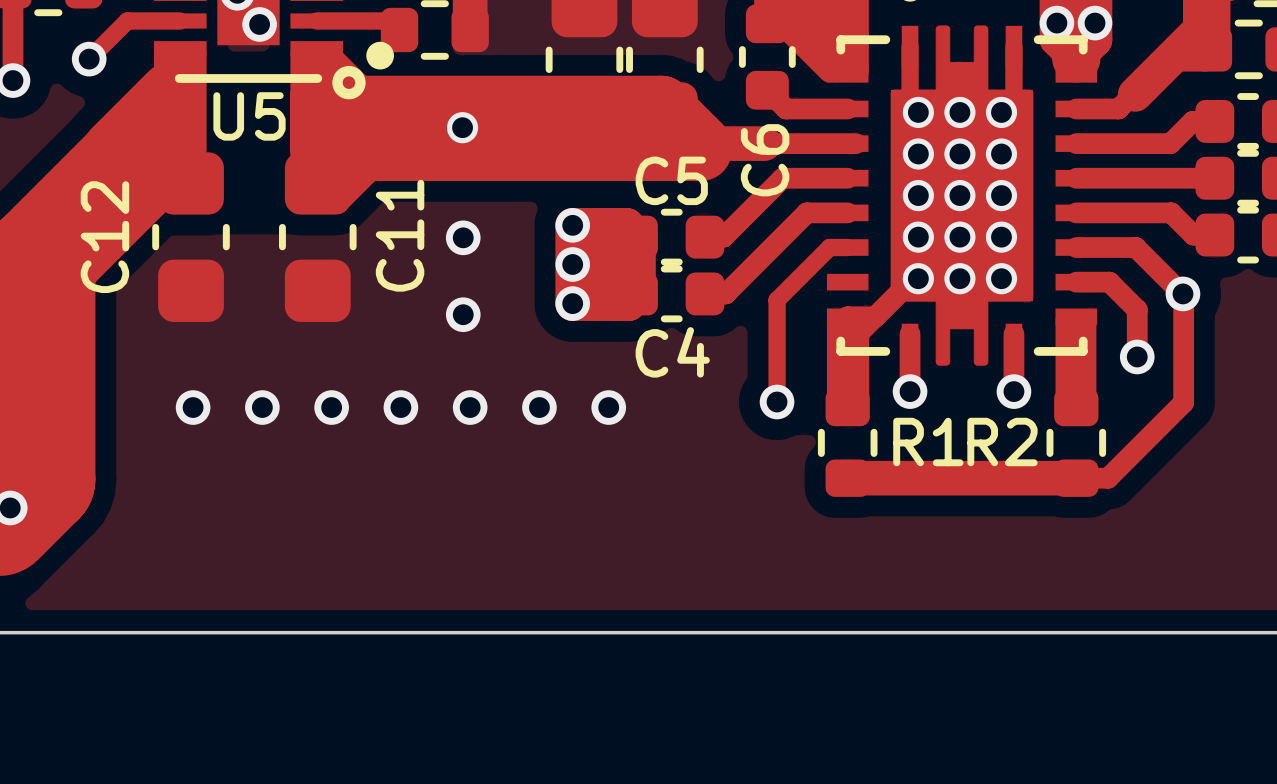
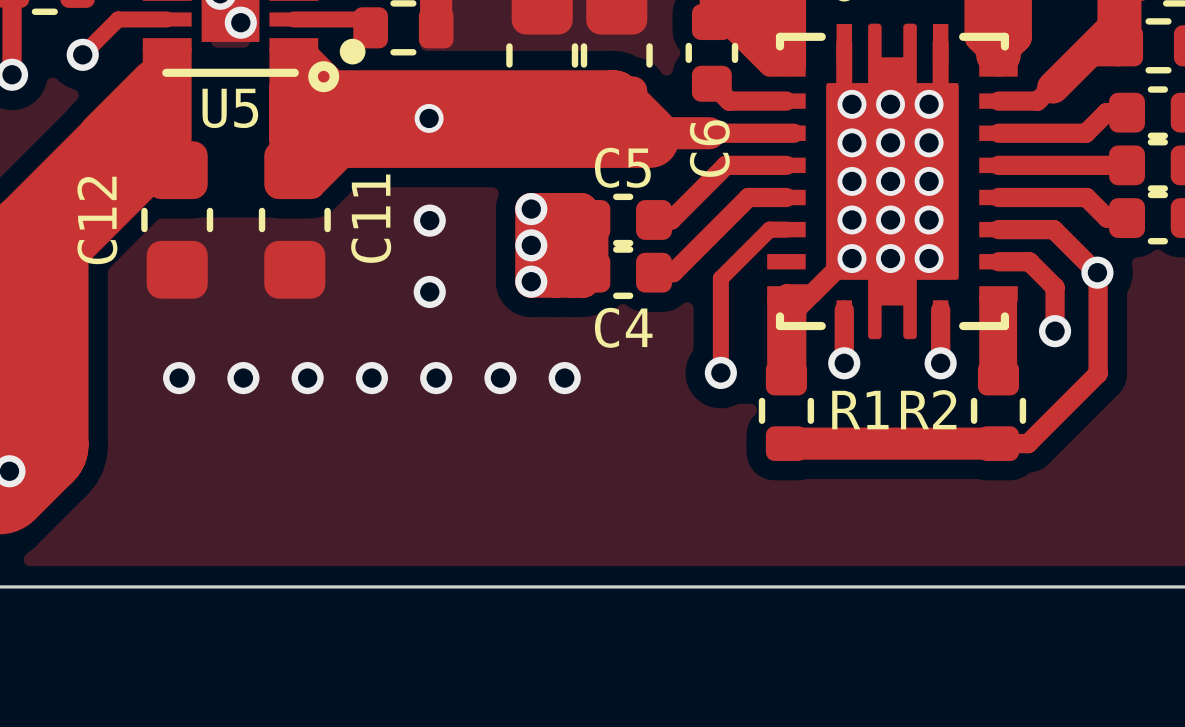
via: (1056, 23) -> none
via: (1095, 23) -> none

